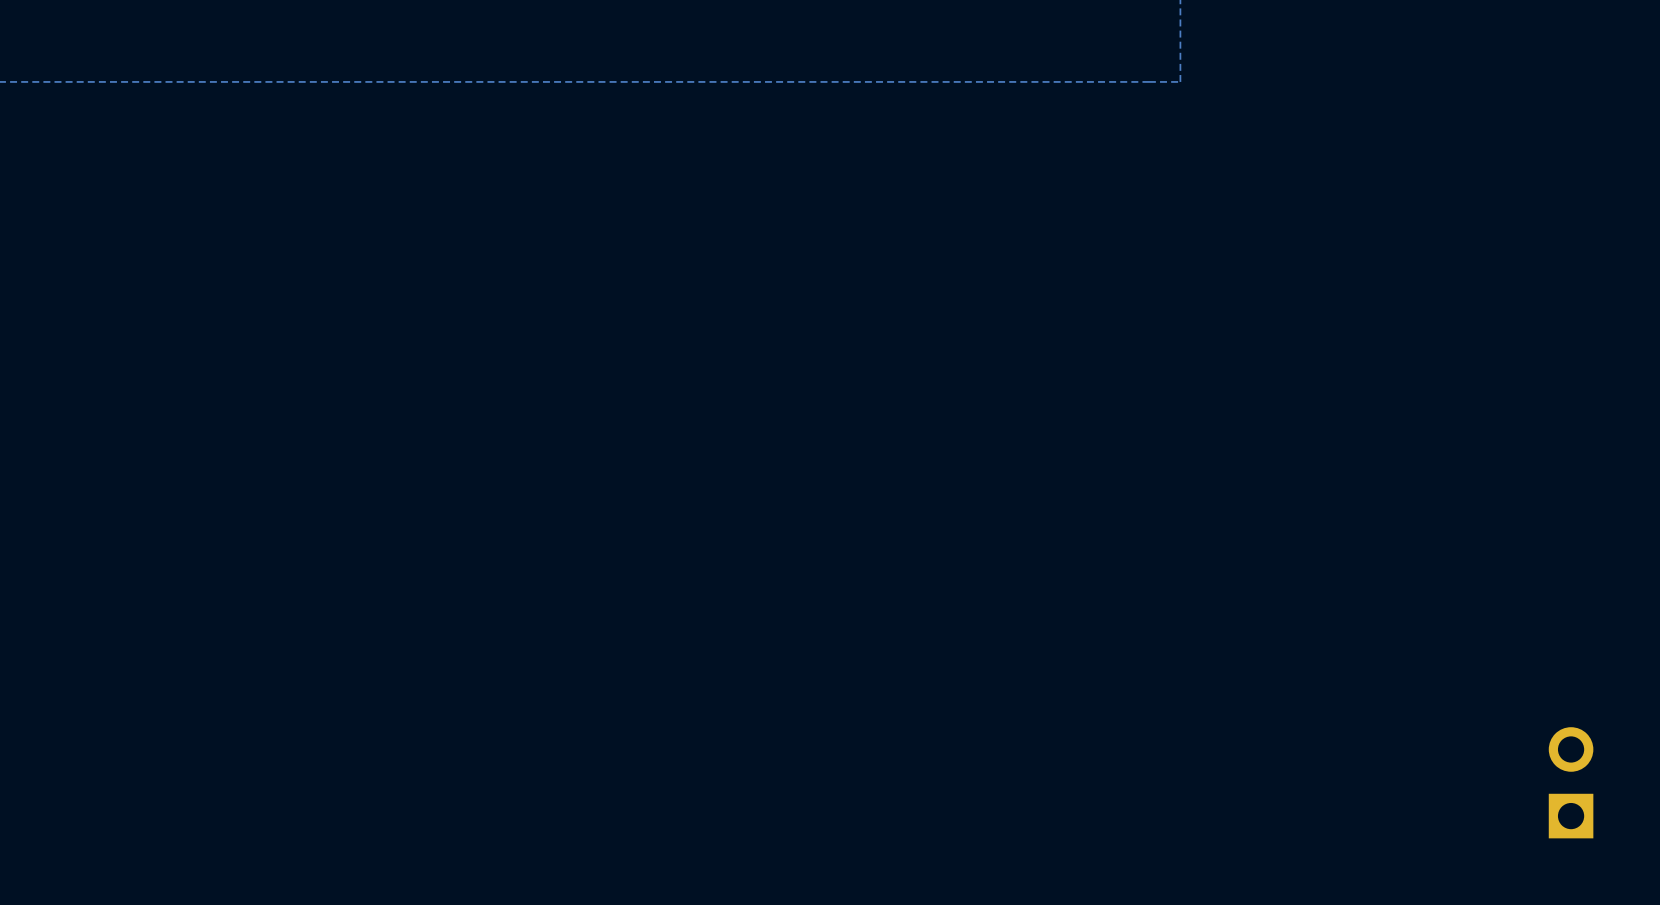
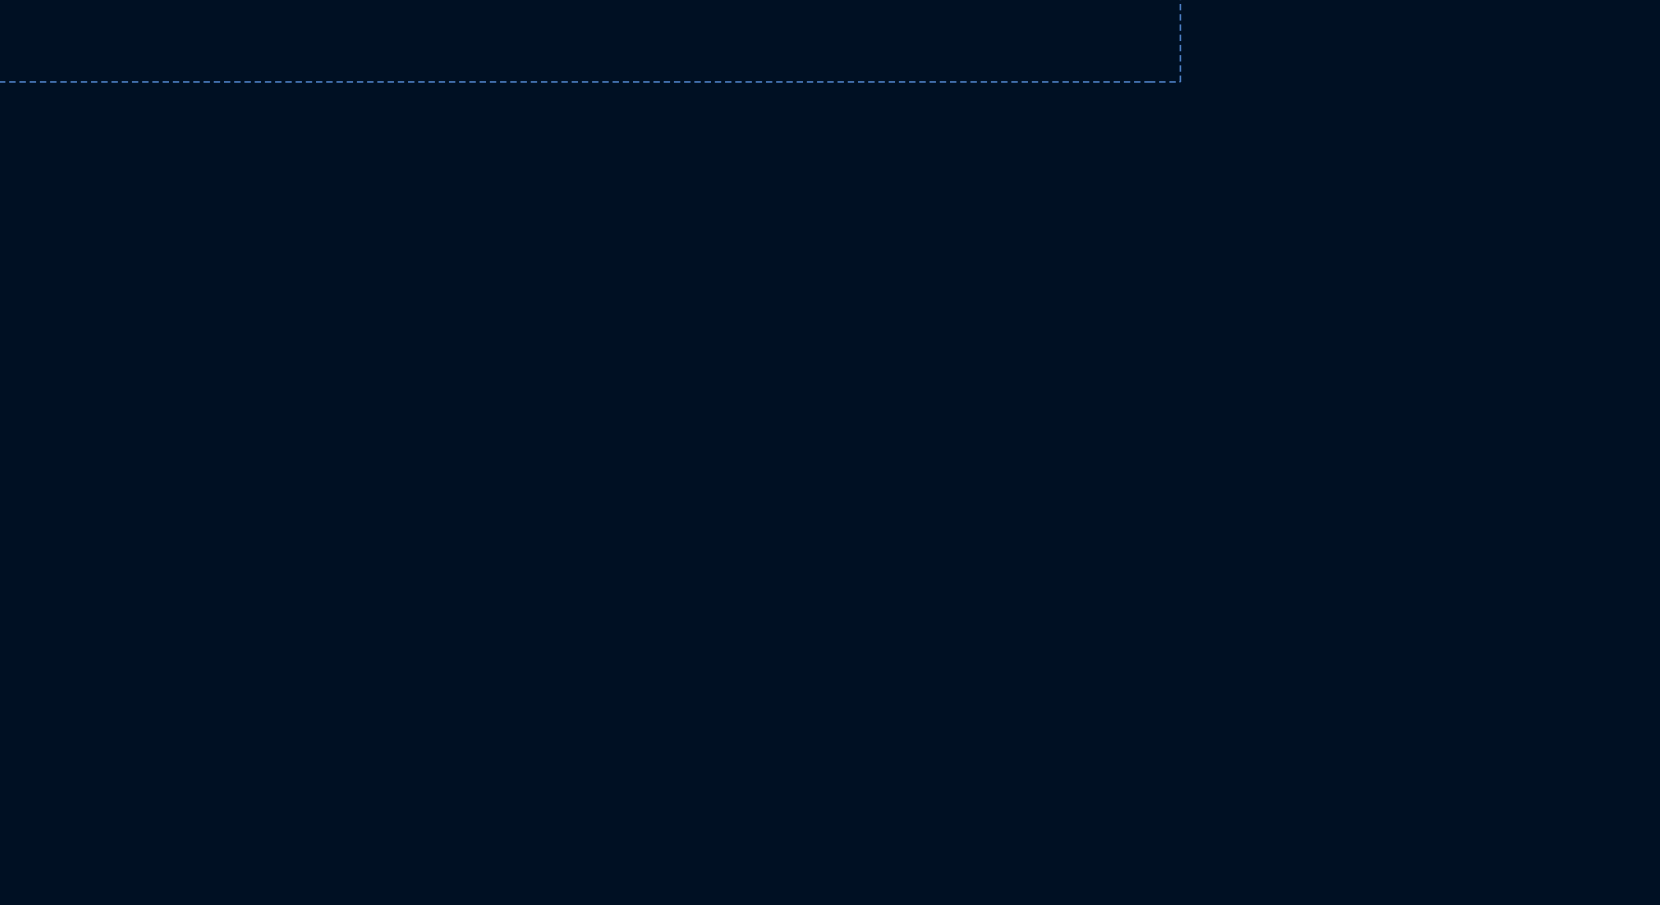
part: (1571, 782) -> none

